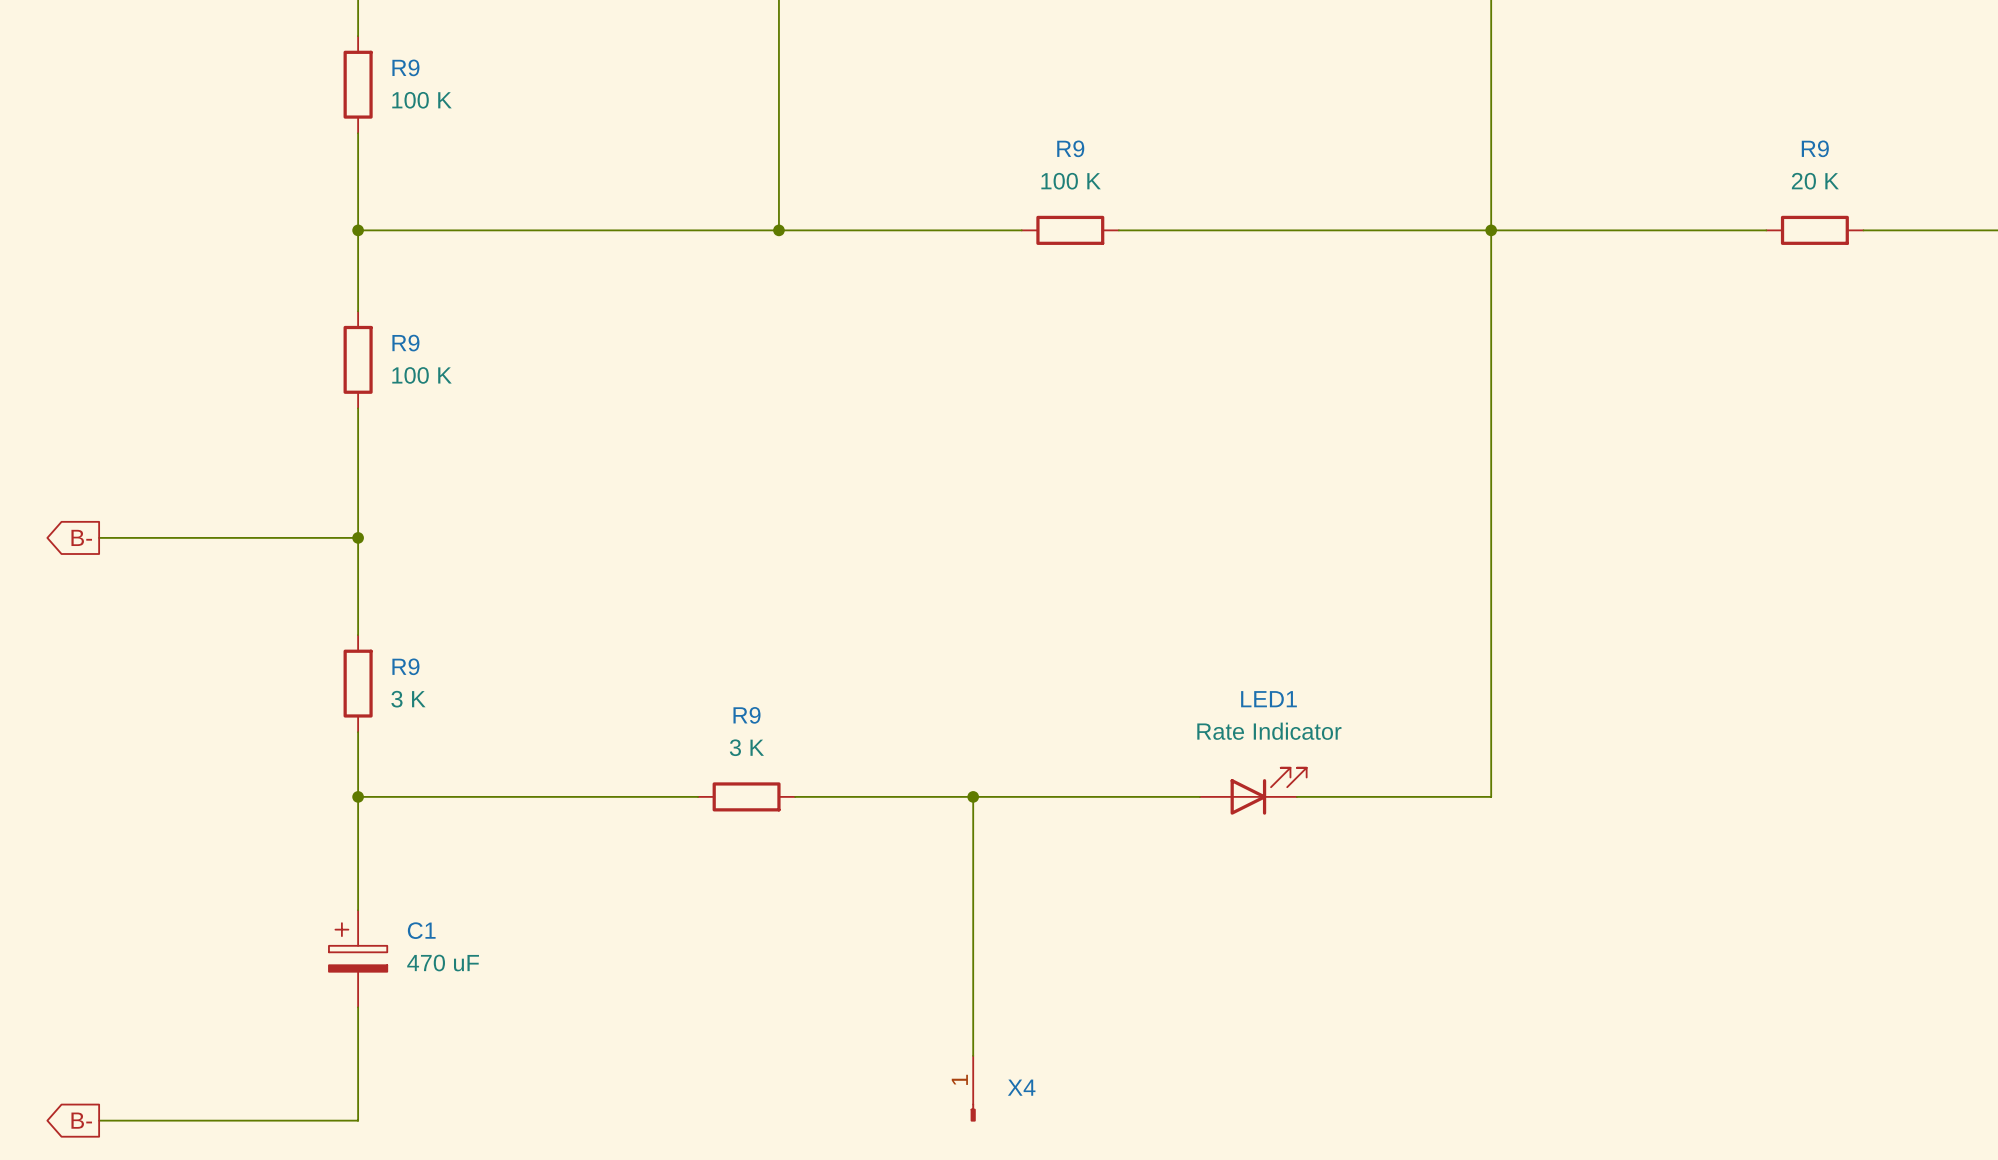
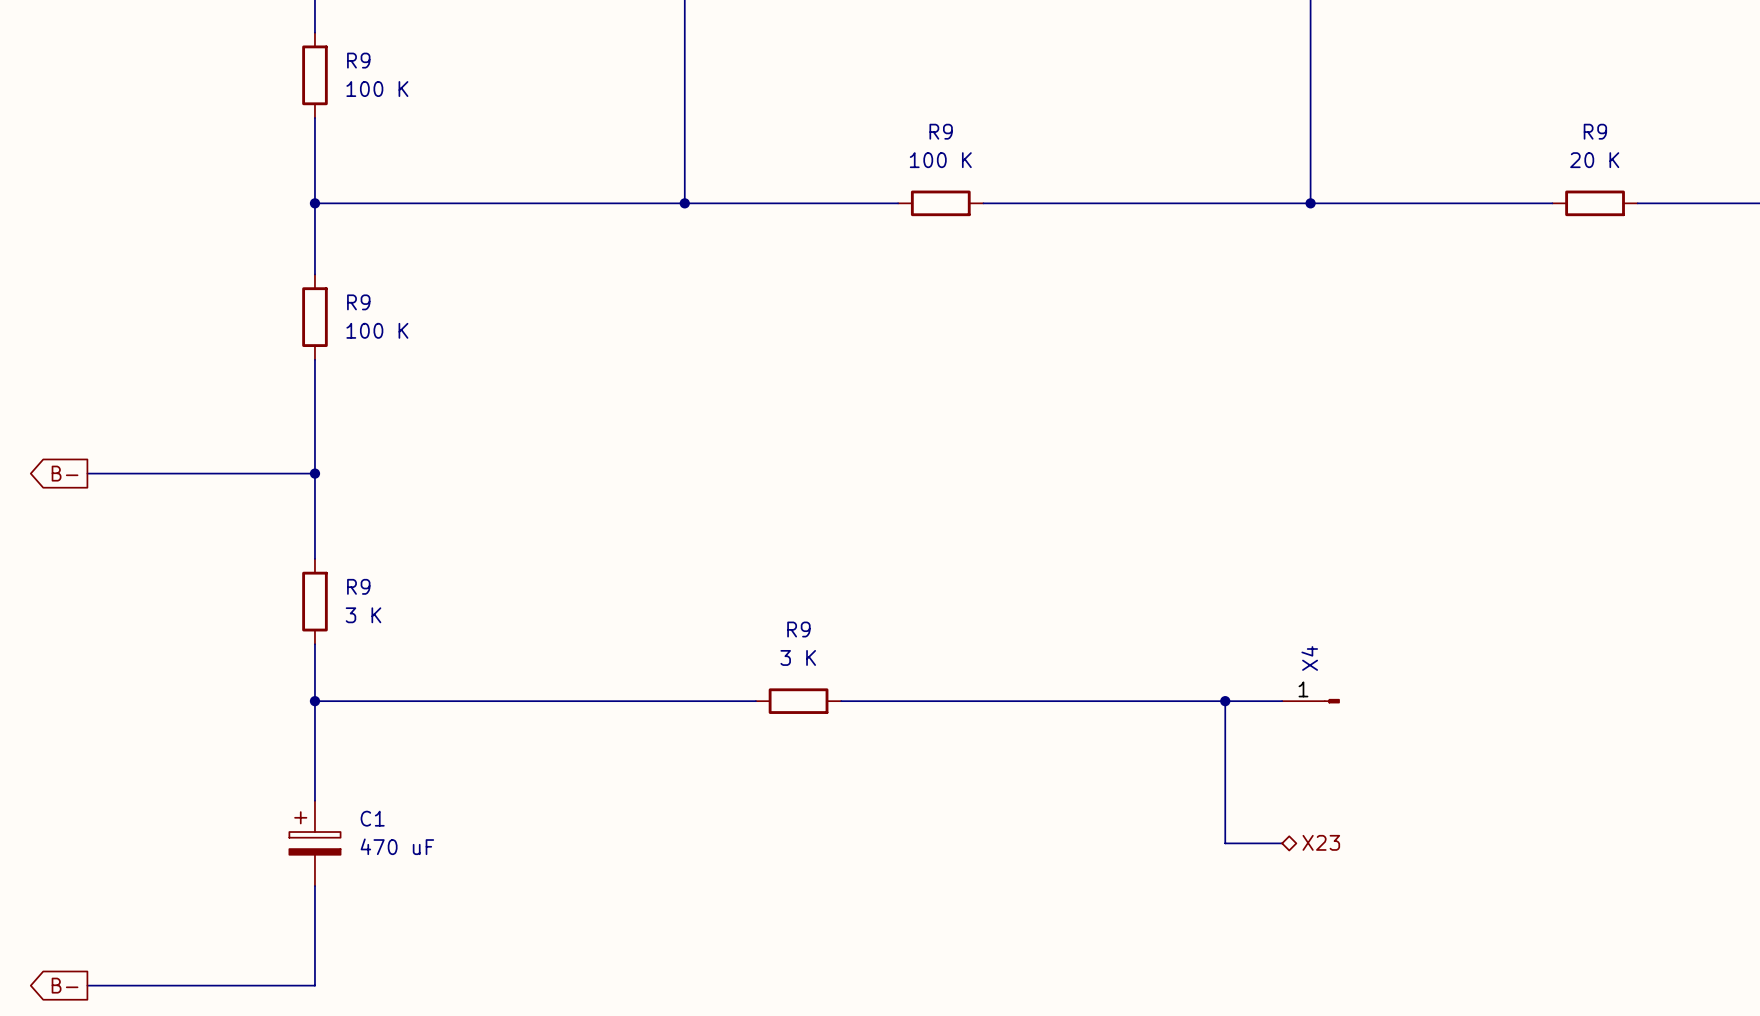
wire: (1491, 230) (1491, 796) (1458, 796) -> none
LED1: Rate Indicator (1253, 791) -> none
R9 position: (746, 796) -> (798, 701)
wire: (859, 796) (957, 796) -> (613, 701) (699, 701)
wire: (973, 796) (973, 1055) -> none
junction: (973, 796) -> none
wire: none -> (1225, 701) (1225, 843) (1282, 843)
junction: none -> (1225, 701)
hierarchical label: none -> X23 (1321, 842)
X4 position: (973, 1088) -> (1311, 701)
X4 rotation: 0° (973, 1112) -> 90° counterclockwise (1331, 701)

